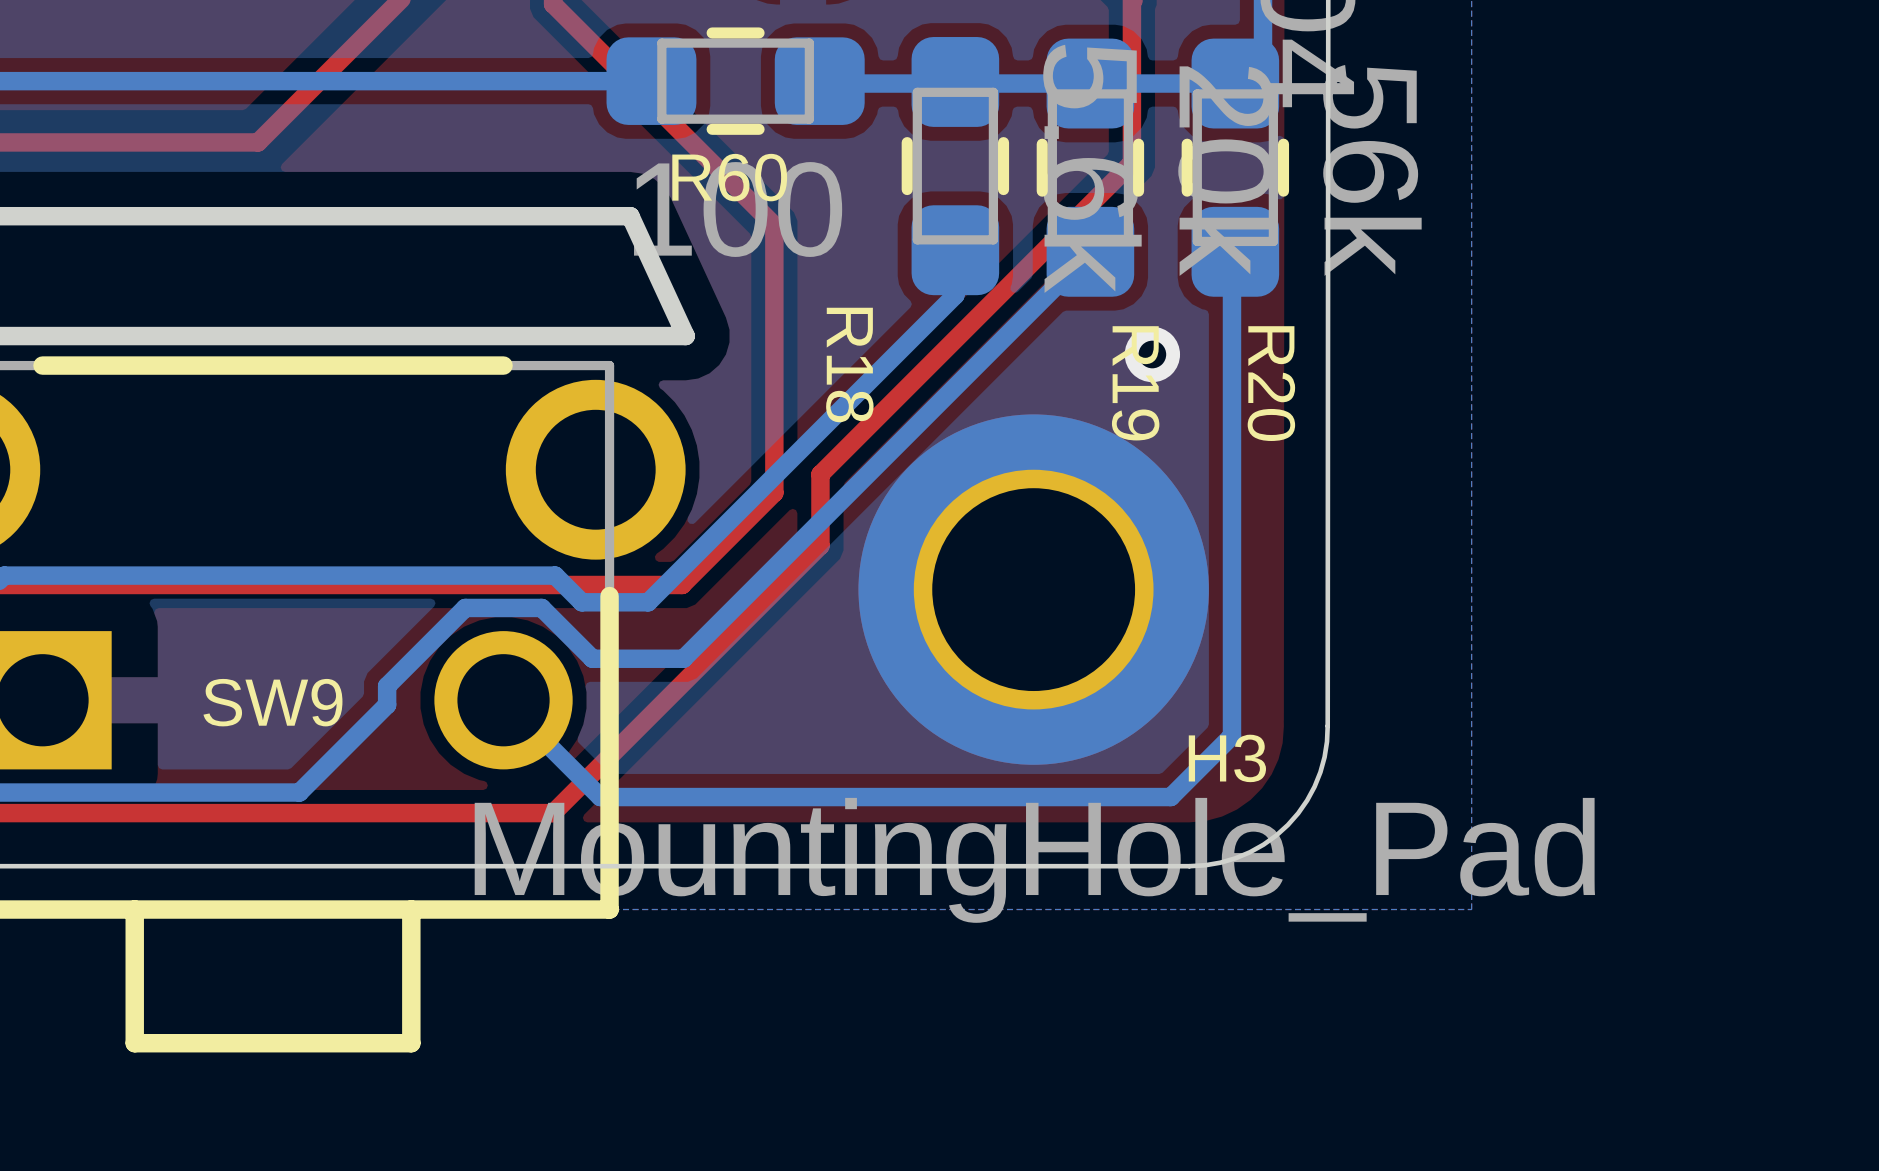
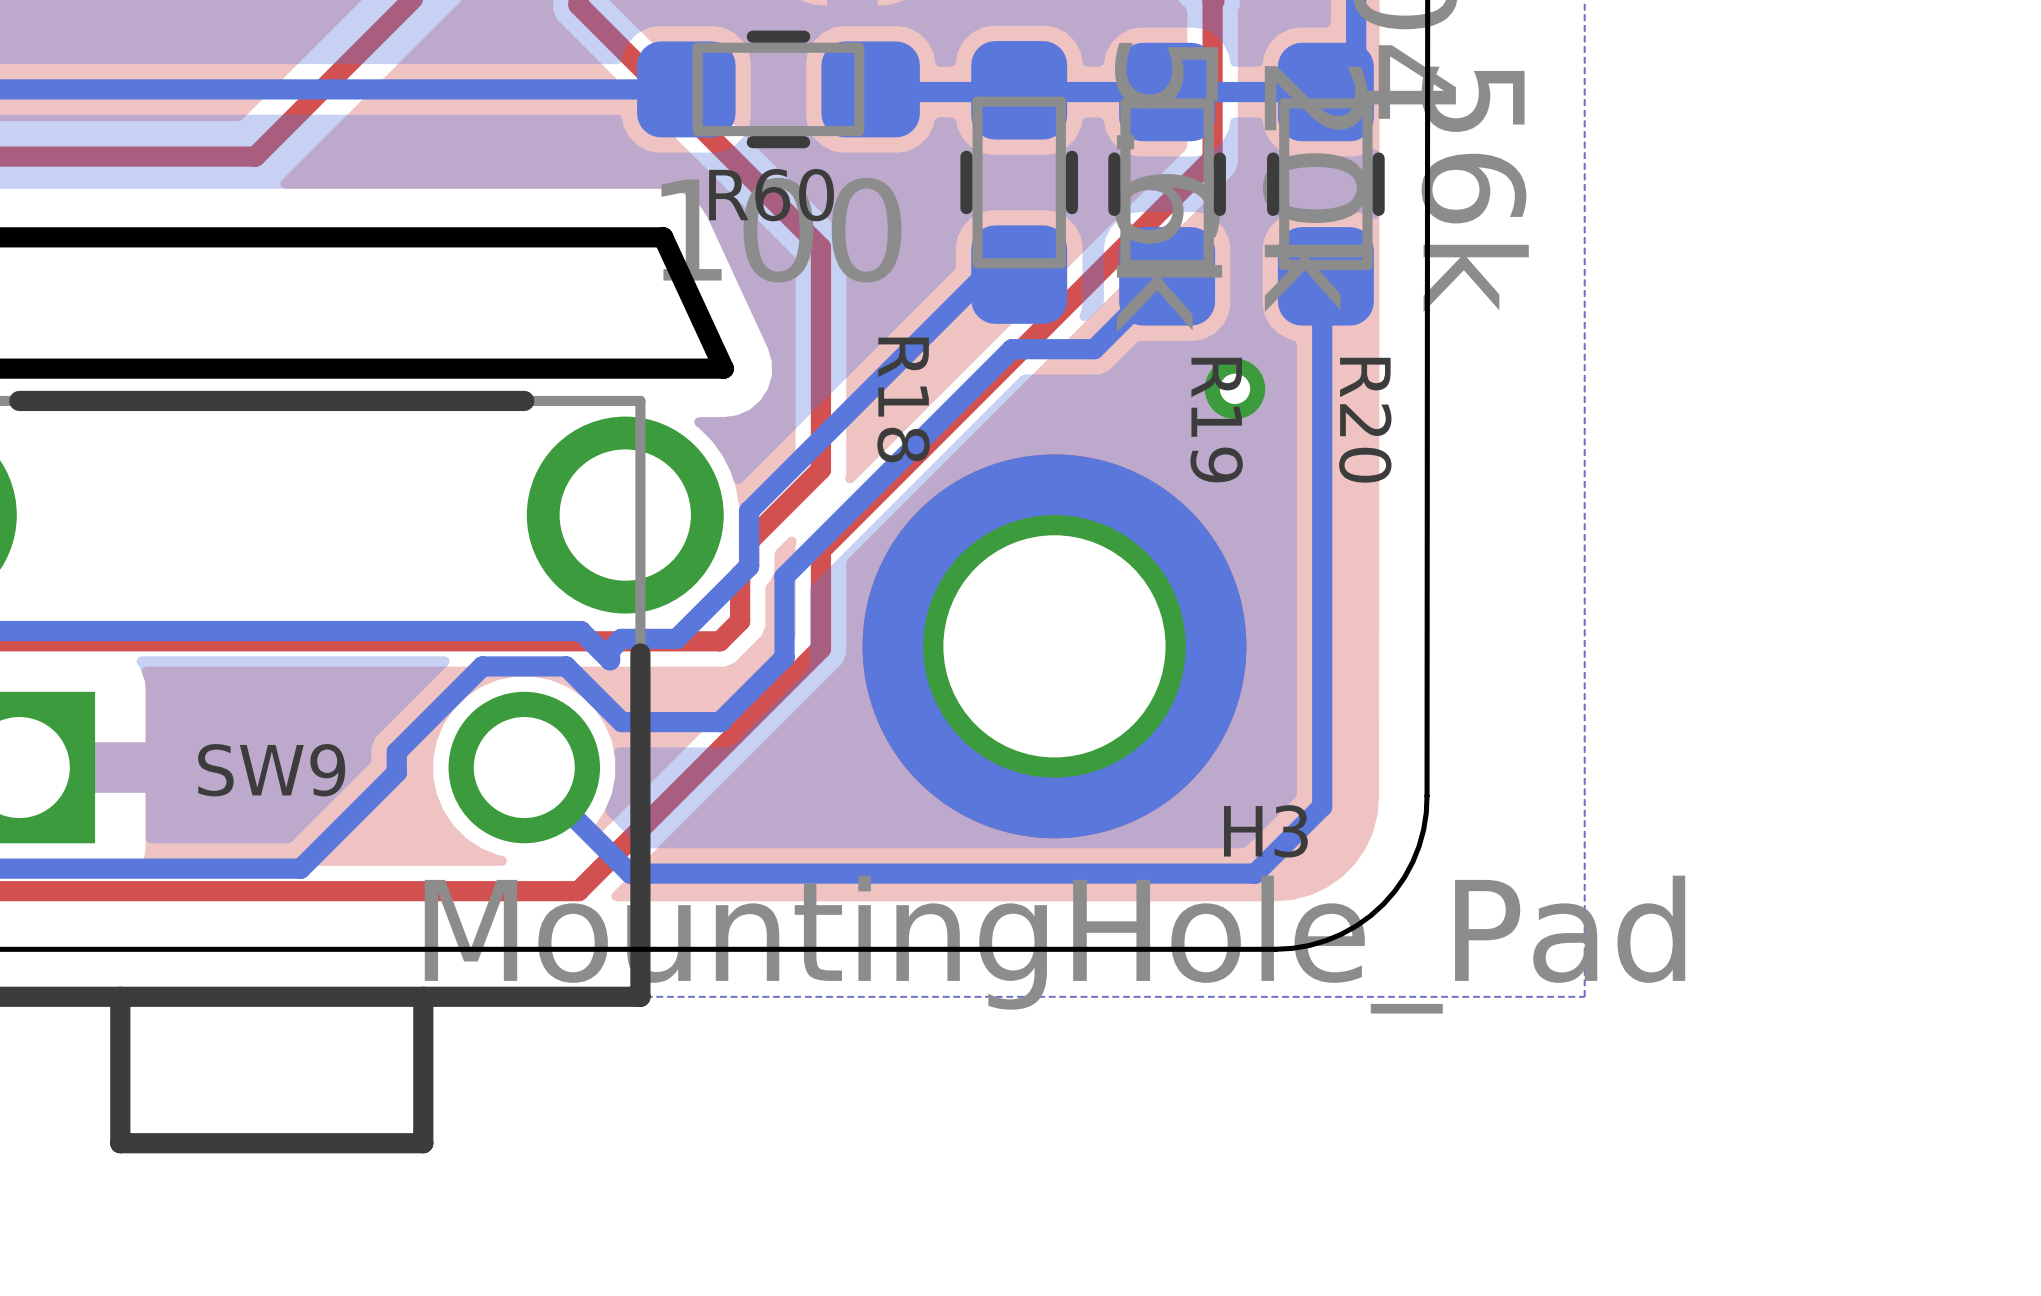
top track: (1131, 144) (1131, 162) (820, 474) (820, 545) (774, 591) -> (1212, 158) (820, 550) (820, 648)
bottom track: (955, 250) (955, 295) (648, 602) (581, 602) -> (1019, 274) (985, 274) (749, 511) (749, 566) (676, 638) (621, 638) (610, 650) (610, 660)
bottom track: (1023, 318) (683, 658) -> (1094, 349) (1012, 349) (784, 576) (784, 657) (719, 722)
top track: (774, 428) (774, 492) (700, 566) -> (820, 469) (749, 541) (749, 566) (740, 575) (740, 621)
H3 position: (1033, 589) -> (1054, 646)

